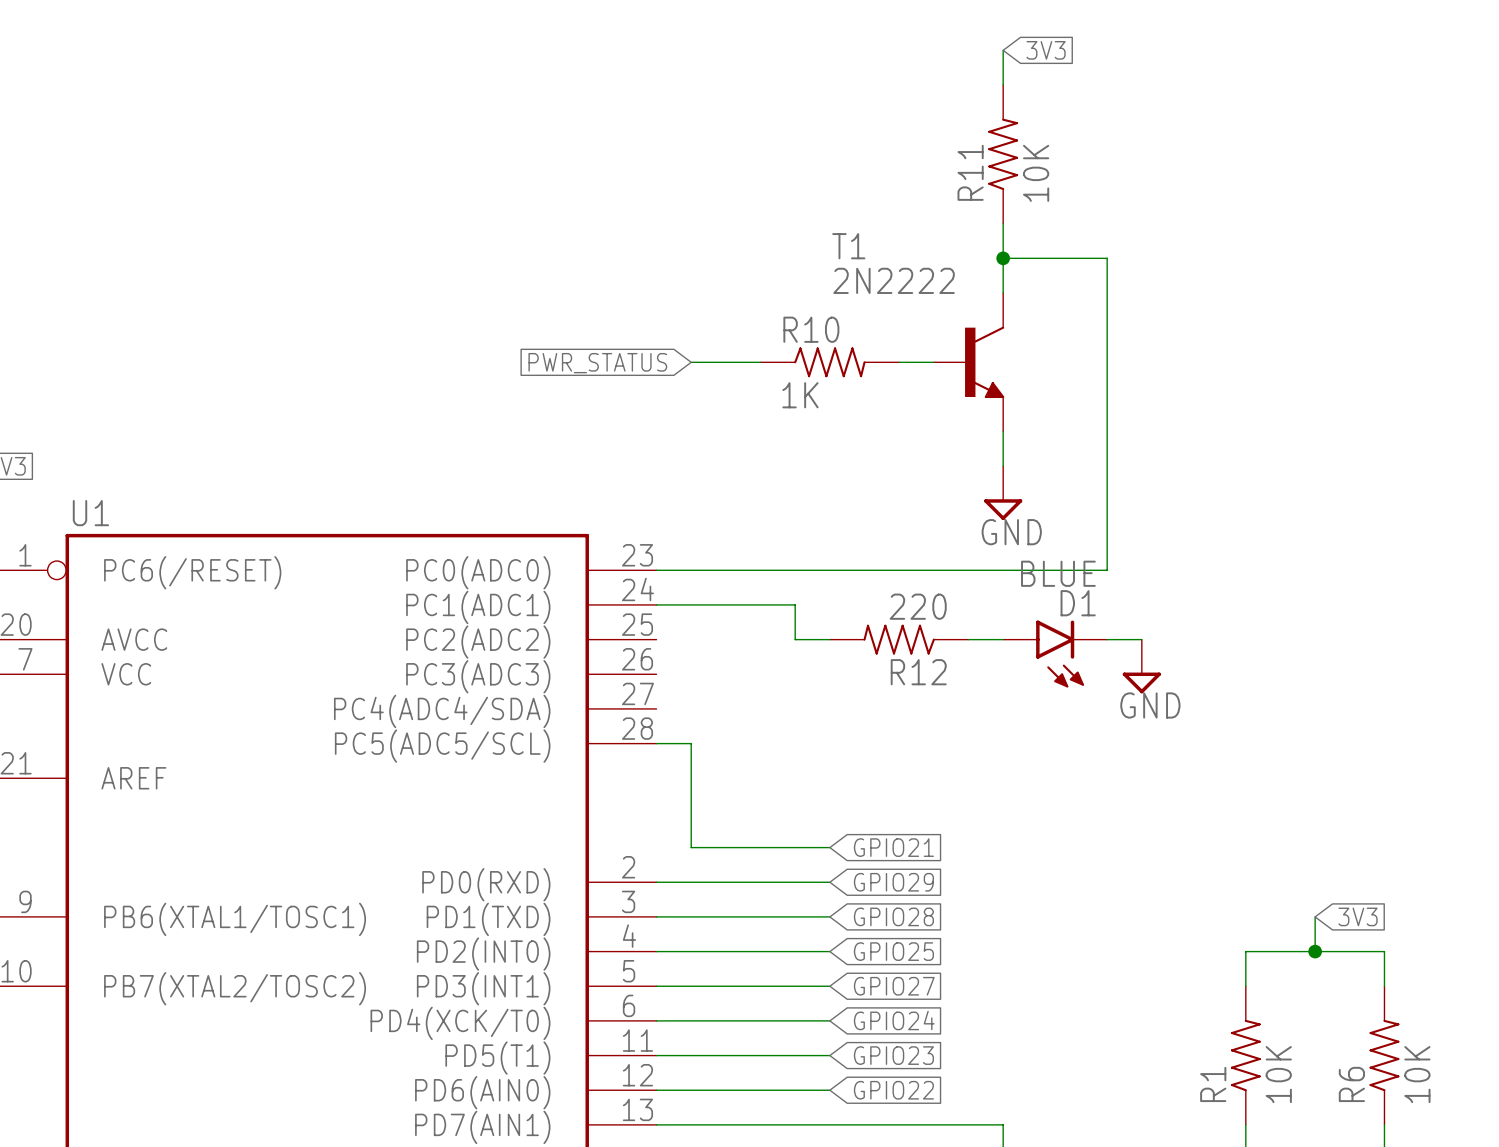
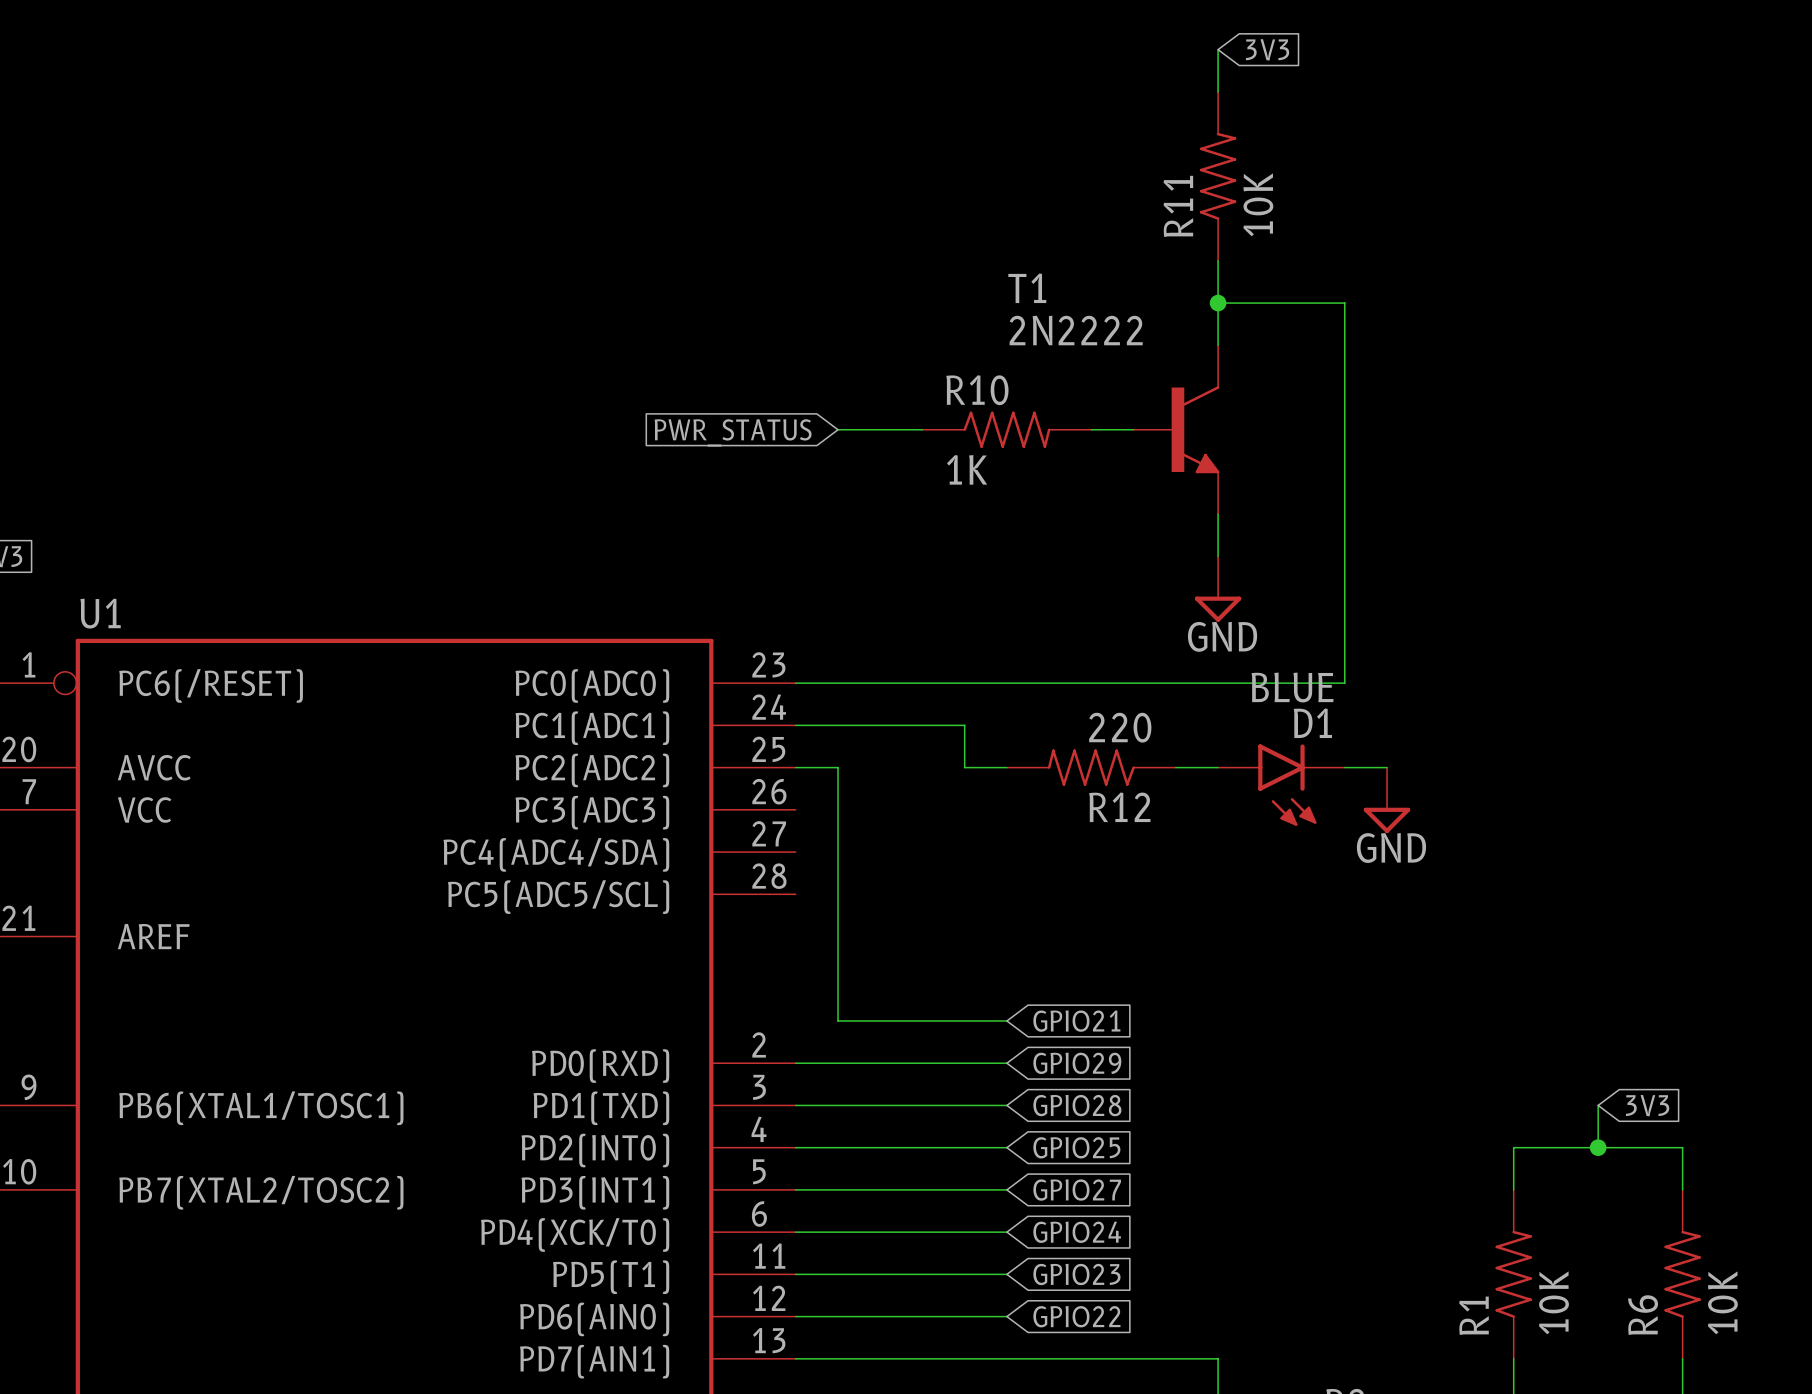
wire: (656, 743) (691, 743) -> (795, 767) (838, 767) (838, 894)

